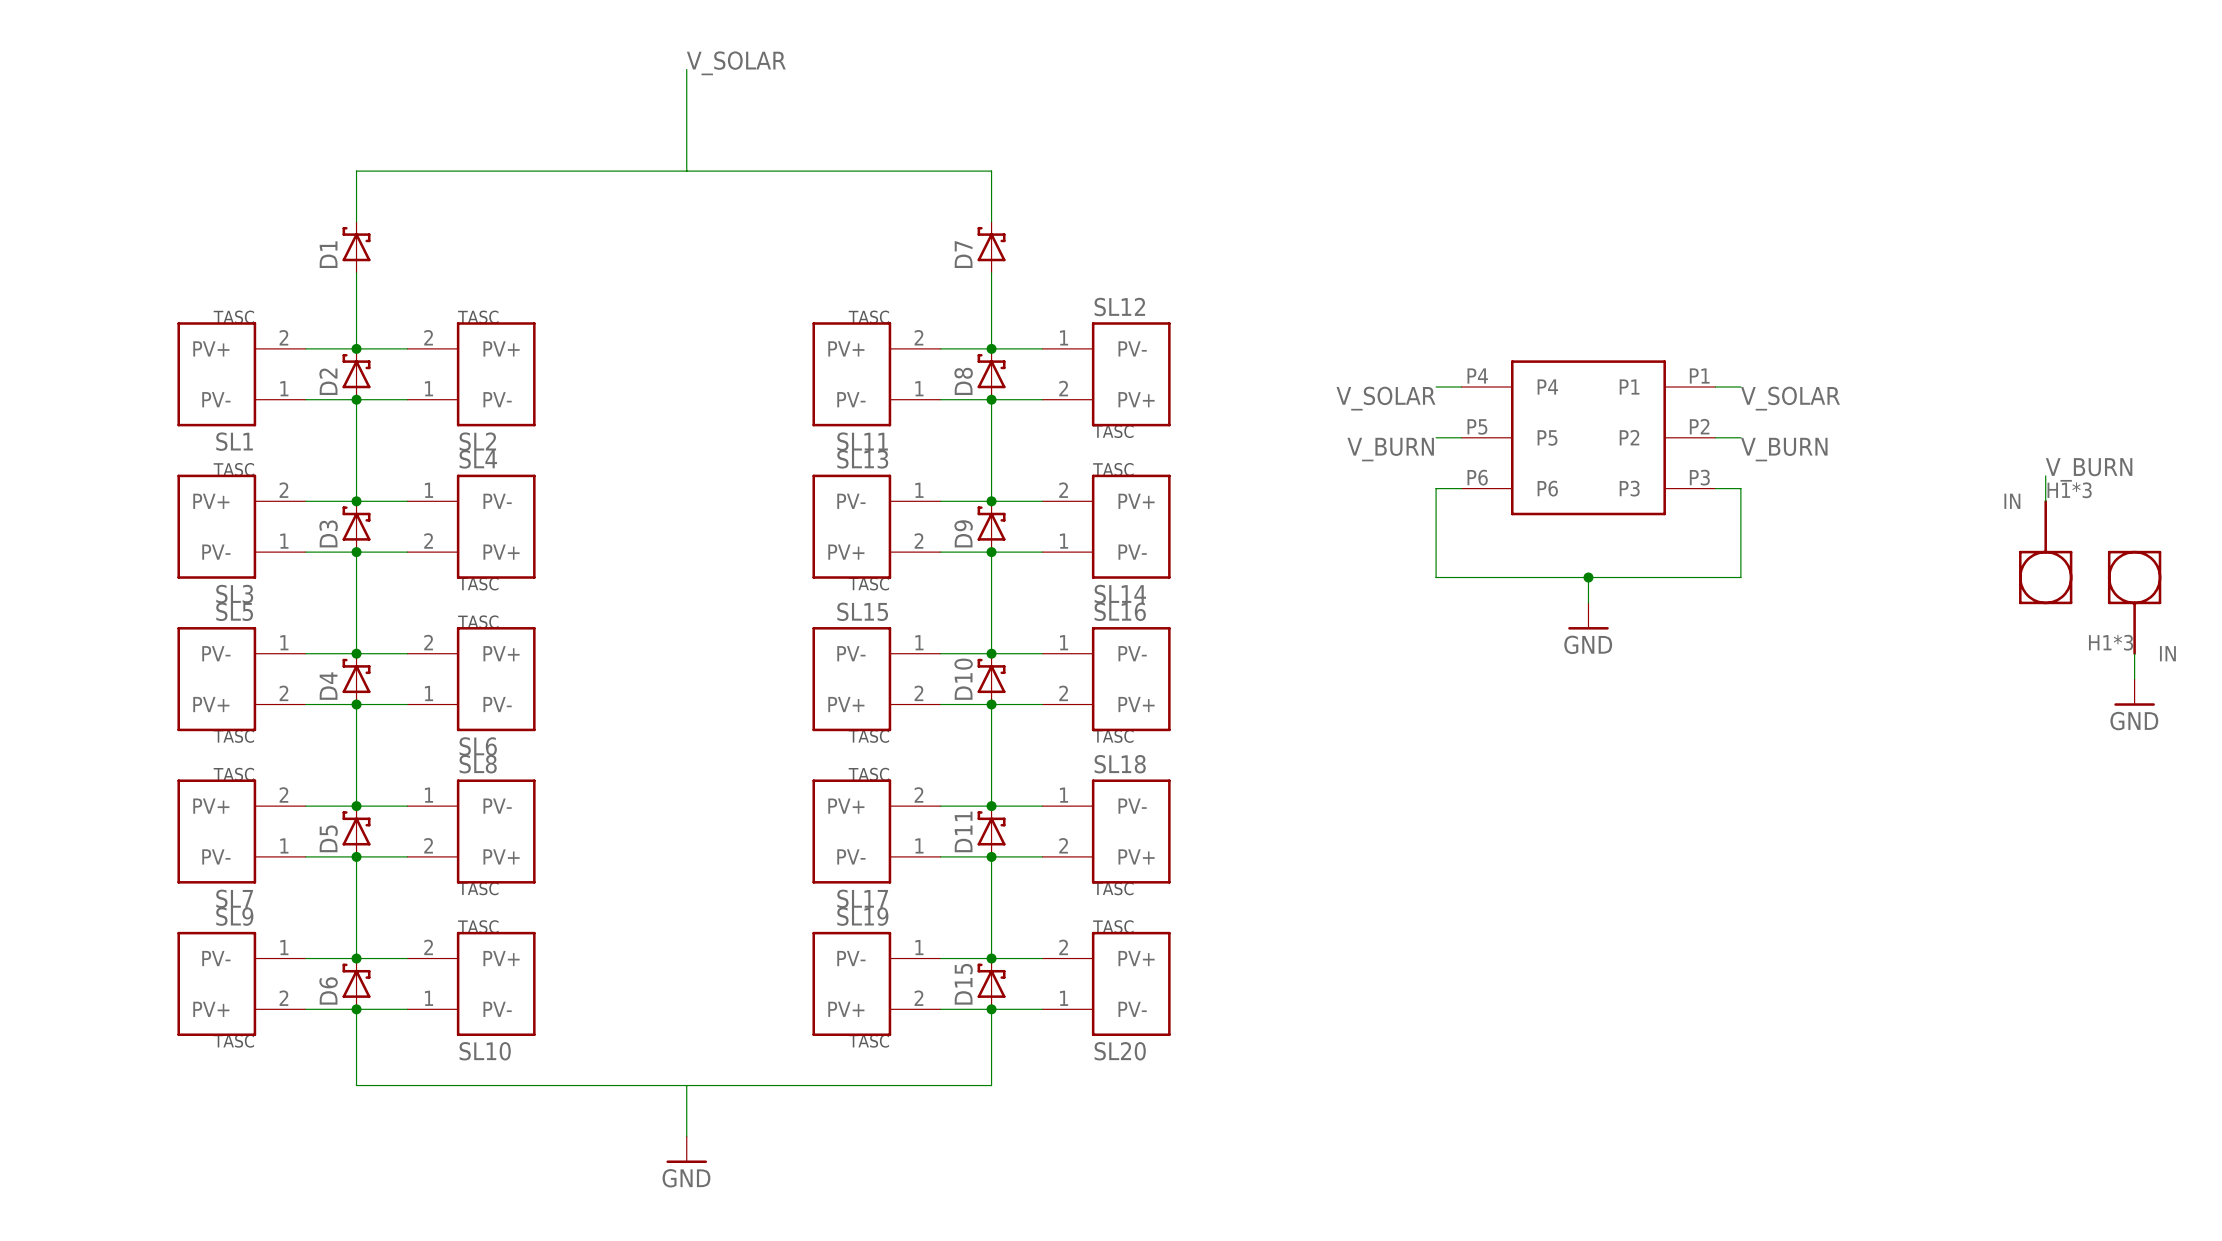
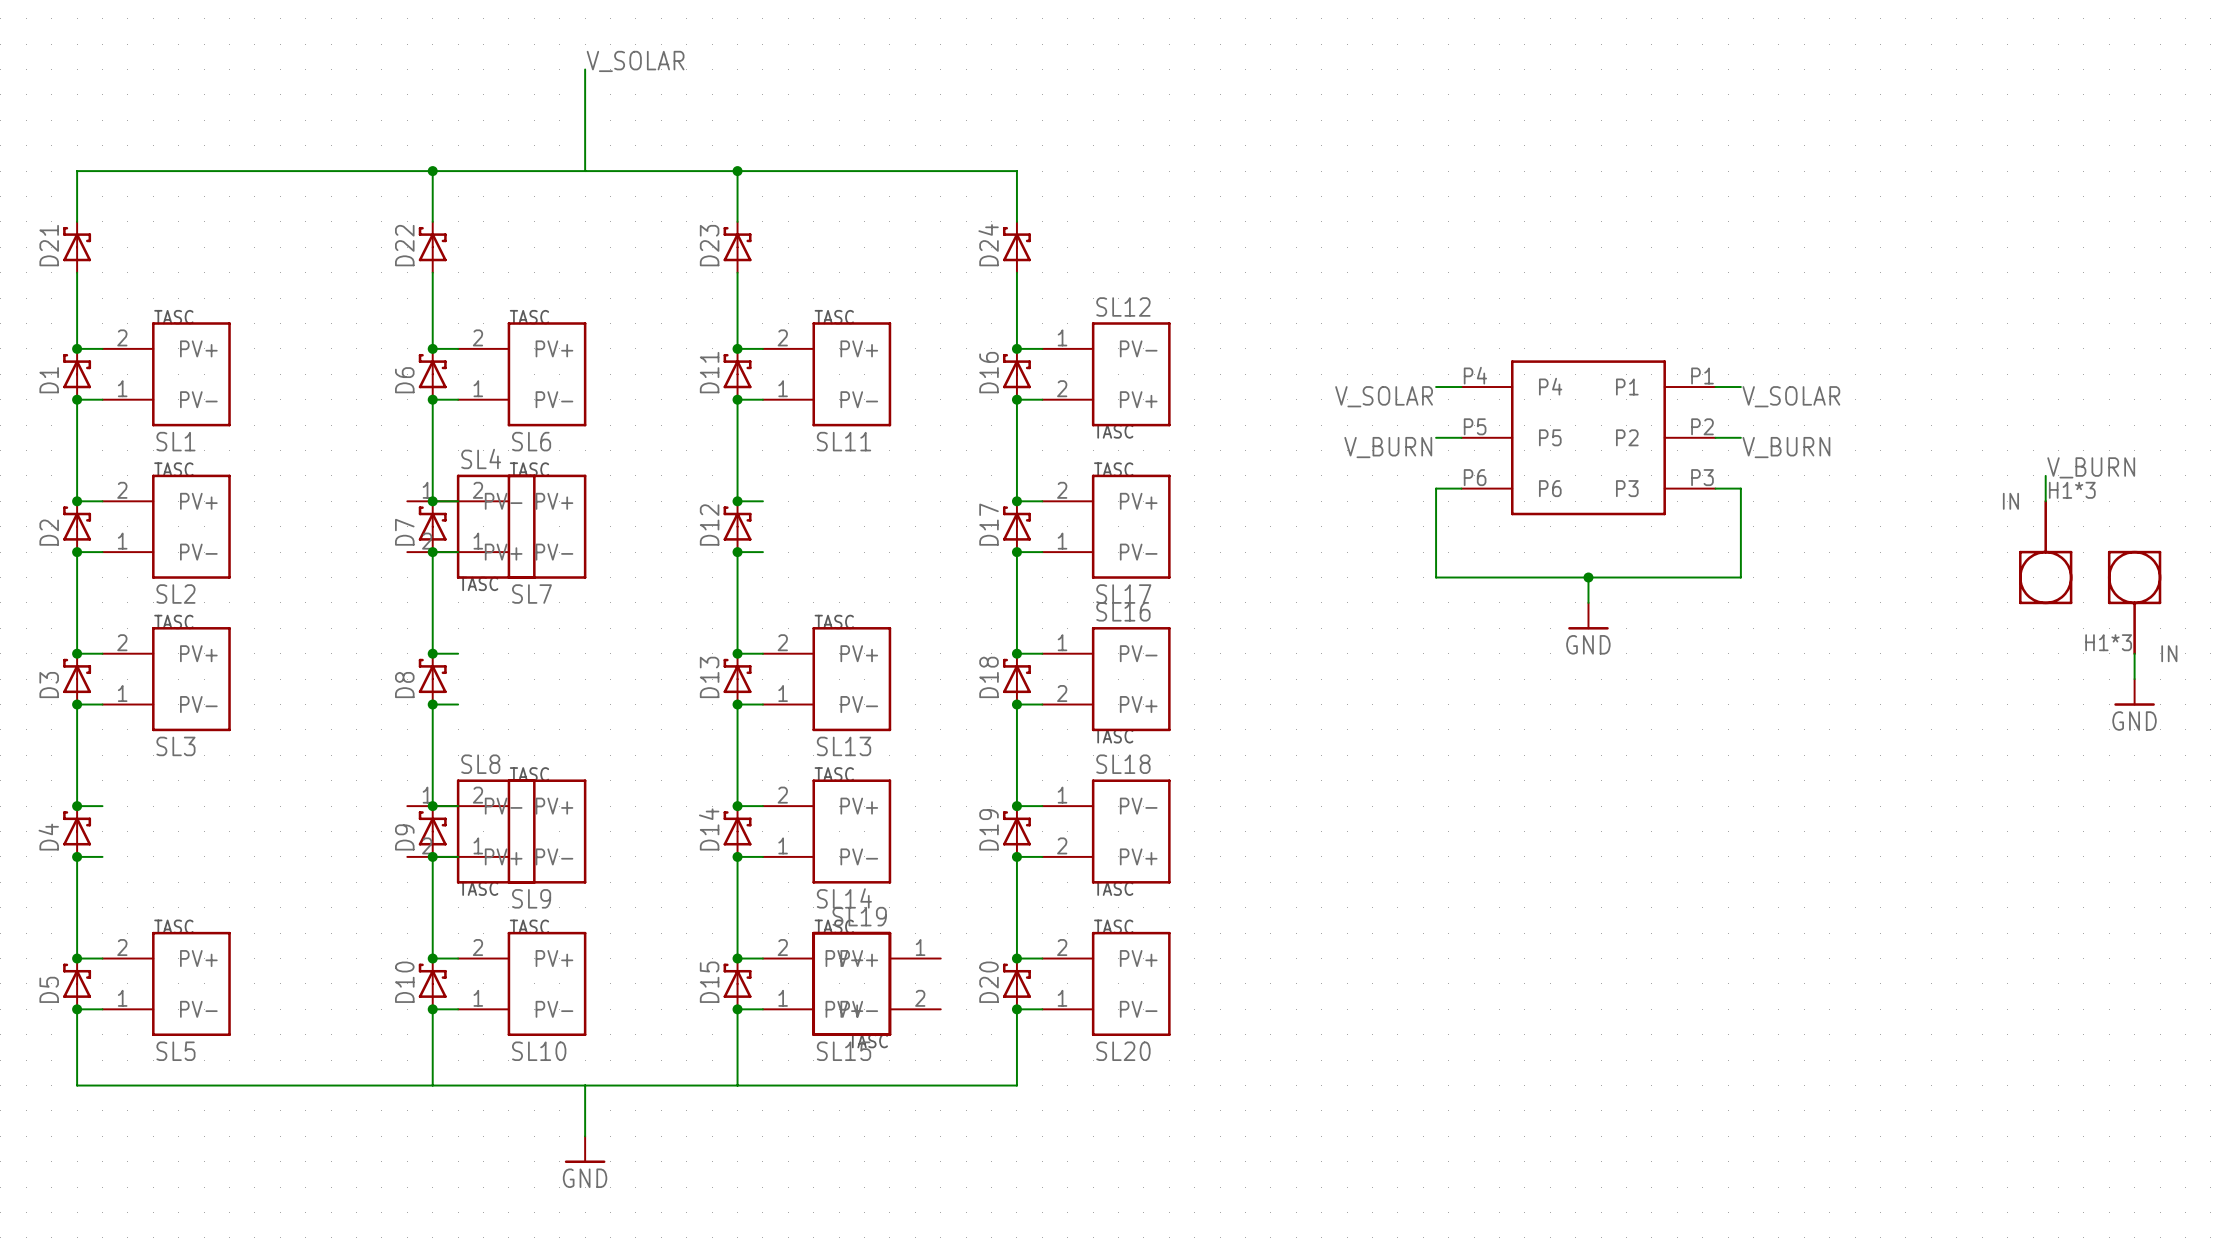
label position: V_SOLAR (736, 63) -> V_SOLAR (635, 61)
wire: (686, 69) (686, 171) -> (585, 69) (585, 171)
wire: (356, 171) (356, 221) -> (356, 171) (77, 171) (77, 221)
wire: none -> (432, 171) (432, 221)
junction: none -> (432, 171)
wire: none -> (737, 171) (737, 221)
junction: none -> (737, 171)
wire: (991, 171) (991, 221) -> (991, 171) (1016, 171) (1016, 221)
D21: none -> (77, 247)
D1 position: (356, 247) -> (77, 374)
D22: none -> (432, 247)
D23: none -> (737, 247)
D7 position: (991, 247) -> (432, 526)
D24: none -> (1016, 247)
wire: none -> (77, 272) (77, 348) (102, 348)
wire: (356, 272) (356, 348) -> none
wire: none -> (432, 272) (432, 348) (458, 348)
wire: none -> (737, 272) (737, 348) (762, 348)
wire: (991, 272) (991, 348) -> none
junction: none -> (77, 348)
wire: (305, 348) (407, 348) -> none
junction: (356, 348) -> none
junction: none -> (432, 348)
junction: none -> (737, 348)
wire: (940, 348) (1016, 348) -> (1016, 272) (1016, 348)
junction position: (991, 348) -> (1016, 348)
SL1 flip: as is (216, 374) -> left-right (191, 374)
D2 position: (356, 374) -> (77, 526)
SL2 position: (471, 374) -> (166, 526)
SL11 flip: as is (851, 374) -> left-right (851, 374)
D8 position: (991, 374) -> (432, 679)
D16: none -> (1016, 374)
junction: none -> (77, 399)
wire: none -> (102, 399) (77, 399) (77, 501) (102, 501)
wire: (305, 399) (407, 399) -> none
wire: (356, 399) (356, 501) -> none
junction: (356, 399) -> none
junction: none -> (432, 399)
wire: none -> (458, 399) (432, 399) (432, 501) (458, 501)
junction: none -> (737, 399)
wire: none -> (762, 399) (737, 399) (737, 501) (762, 501)
wire: (940, 399) (1016, 399) -> (1016, 501) (1016, 399)
wire: (991, 399) (991, 501) -> none
junction position: (991, 399) -> (1016, 399)
SL13 name position: SL13 (862, 459) -> SL13 (844, 746)
SL13 symbol: [812, 474, 941, 579] -> [762, 627, 892, 732]
junction: none -> (77, 501)
wire: (305, 501) (407, 501) -> none
junction: (356, 501) -> none
junction: none -> (432, 501)
junction: none -> (737, 501)
wire: (940, 501) (1016, 501) -> none
junction position: (991, 501) -> (1016, 501)
SL3 flip: as is (216, 526) -> left-right (191, 679)
SL3 position: (241, 526) -> (166, 679)
D3 position: (356, 526) -> (77, 679)
D12: none -> (737, 526)
D9 position: (991, 526) -> (432, 831)
D17: none -> (1016, 526)
junction: none -> (77, 552)
wire: none -> (102, 552) (77, 552) (77, 653) (102, 653)
wire: (305, 552) (407, 552) -> none
wire: (356, 552) (356, 653) -> none
junction: (356, 552) -> none
junction: none -> (432, 552)
wire: none -> (458, 552) (432, 552) (432, 653) (458, 653)
junction: none -> (737, 552)
wire: none -> (762, 552) (737, 552) (737, 653) (762, 653)
wire: (940, 552) (1016, 552) -> (1016, 653) (1016, 552)
wire: (991, 552) (991, 653) -> none
junction position: (991, 552) -> (1016, 552)
SL14 name: SL14 (1120, 594) -> SL17 (1123, 594)
SL5 name position: SL5 (234, 611) -> SL5 (175, 1051)
SL15 name position: SL15 (862, 611) -> SL15 (844, 1051)
SL5 symbol: [177, 627, 306, 732] -> [102, 931, 231, 1037]
SL15 symbol: [812, 627, 941, 732] -> [762, 931, 892, 1037]
junction: none -> (77, 653)
wire: (305, 653) (407, 653) -> none
junction: (356, 653) -> none
junction: none -> (432, 653)
junction: none -> (737, 653)
wire: (940, 653) (1016, 653) -> none
junction position: (991, 653) -> (1016, 653)
D4 position: (356, 679) -> (77, 831)
SL6 position: (471, 679) -> (522, 374)
D13: none -> (737, 679)
D10 position: (991, 679) -> (432, 983)
D18: none -> (1016, 679)
junction: none -> (77, 704)
wire: none -> (102, 704) (77, 704) (77, 806) (102, 806)
wire: (305, 704) (407, 704) -> none
wire: (356, 704) (356, 806) -> none
junction: (356, 704) -> none
junction: none -> (432, 704)
wire: none -> (458, 704) (432, 704) (432, 806) (458, 806)
junction: none -> (737, 704)
wire: none -> (762, 704) (737, 704) (737, 806) (762, 806)
wire: (940, 704) (1016, 704) -> (1016, 806) (1016, 704)
wire: (991, 704) (991, 806) -> none
junction position: (991, 704) -> (1016, 704)
junction: none -> (77, 806)
wire: (305, 806) (407, 806) -> none
junction: (356, 806) -> none
junction: none -> (432, 806)
junction: none -> (737, 806)
wire: (940, 806) (1016, 806) -> none
junction position: (991, 806) -> (1016, 806)
SL7 flip: as is (216, 831) -> left-right (547, 526)
SL7 position: (241, 831) -> (522, 526)
D5 position: (356, 831) -> (77, 983)
D14: none -> (737, 831)
SL14: none -> (827, 831)
SL17: (876, 831) -> none
D11 position: (991, 831) -> (737, 374)
D19: none -> (1016, 831)
junction: none -> (77, 856)
wire: none -> (102, 856) (77, 856) (77, 958) (102, 958)
wire: (305, 856) (407, 856) -> none
wire: (356, 856) (356, 958) -> none
junction: (356, 856) -> none
junction: none -> (432, 856)
wire: none -> (458, 856) (432, 856) (432, 958) (458, 958)
junction: none -> (737, 856)
wire: none -> (762, 856) (737, 856) (737, 958) (762, 958)
wire: (940, 856) (1016, 856) -> (1016, 958) (1016, 856)
wire: (991, 856) (991, 958) -> none
junction position: (991, 856) -> (1016, 856)
SL9 name position: SL9 (234, 916) -> SL9 (531, 898)
SL9 symbol: [177, 931, 306, 1037] -> [458, 779, 587, 884]
junction: none -> (77, 958)
wire: (305, 958) (407, 958) -> none
junction: (356, 958) -> none
junction: none -> (432, 958)
junction: none -> (737, 958)
wire: (940, 958) (1016, 958) -> none
junction position: (991, 958) -> (1016, 958)
D6 position: (356, 983) -> (432, 374)
SL10 position: (471, 983) -> (522, 983)
D15 position: (991, 983) -> (737, 983)
D20: none -> (1016, 983)
junction: none -> (77, 1009)
wire: (305, 1009) (407, 1009) -> none
wire: (356, 1009) (356, 1085) -> (102, 1009) (77, 1009) (77, 1085) (356, 1085)
junction: (356, 1009) -> none
junction: none -> (432, 1009)
wire: none -> (458, 1009) (432, 1009) (432, 1085)
junction: none -> (737, 1009)
wire: none -> (762, 1009) (737, 1009) (737, 1085)
wire: (940, 1009) (1016, 1009) -> none
wire: (991, 1009) (991, 1085) -> (1016, 1009) (1016, 1085) (991, 1085)
junction position: (991, 1009) -> (1016, 1009)
wire: (686, 1085) (686, 1136) -> (585, 1085) (585, 1136)
power symbol position: GND (686, 1149) -> GND (585, 1149)

